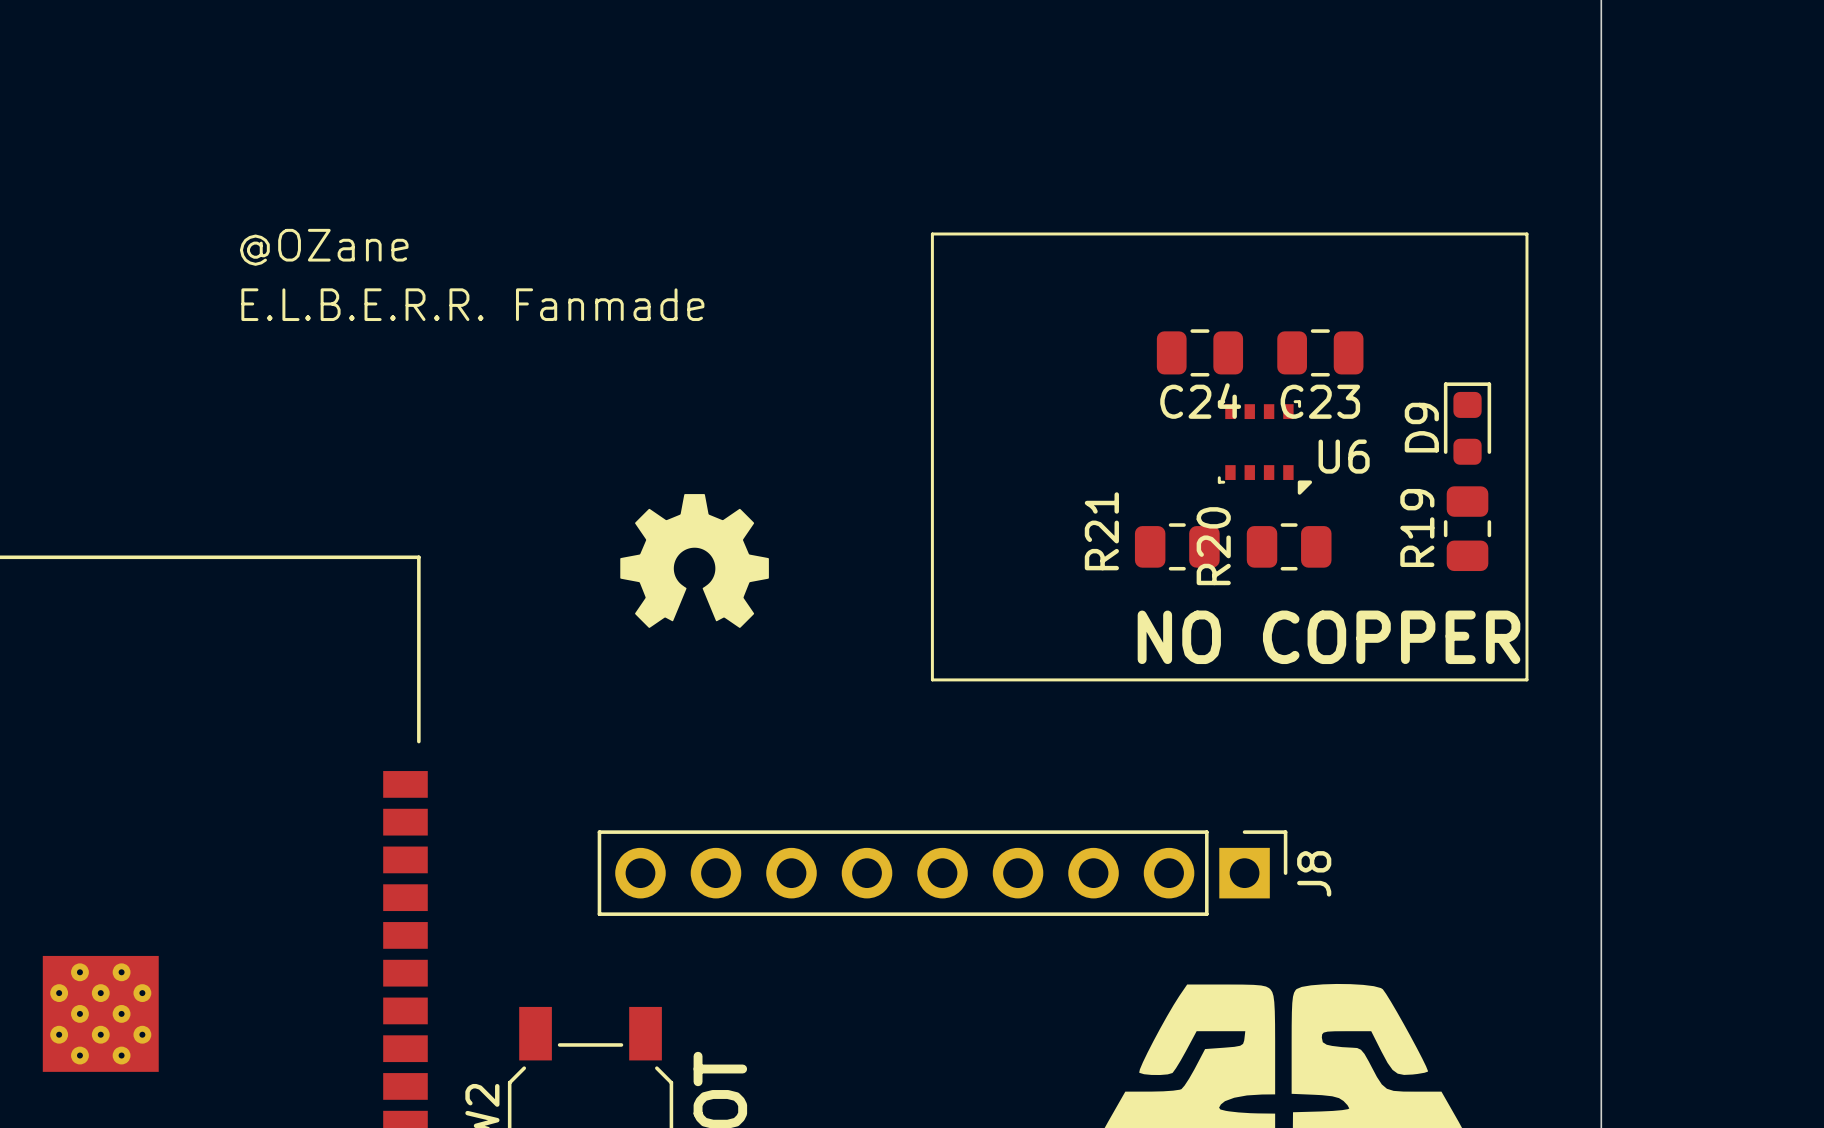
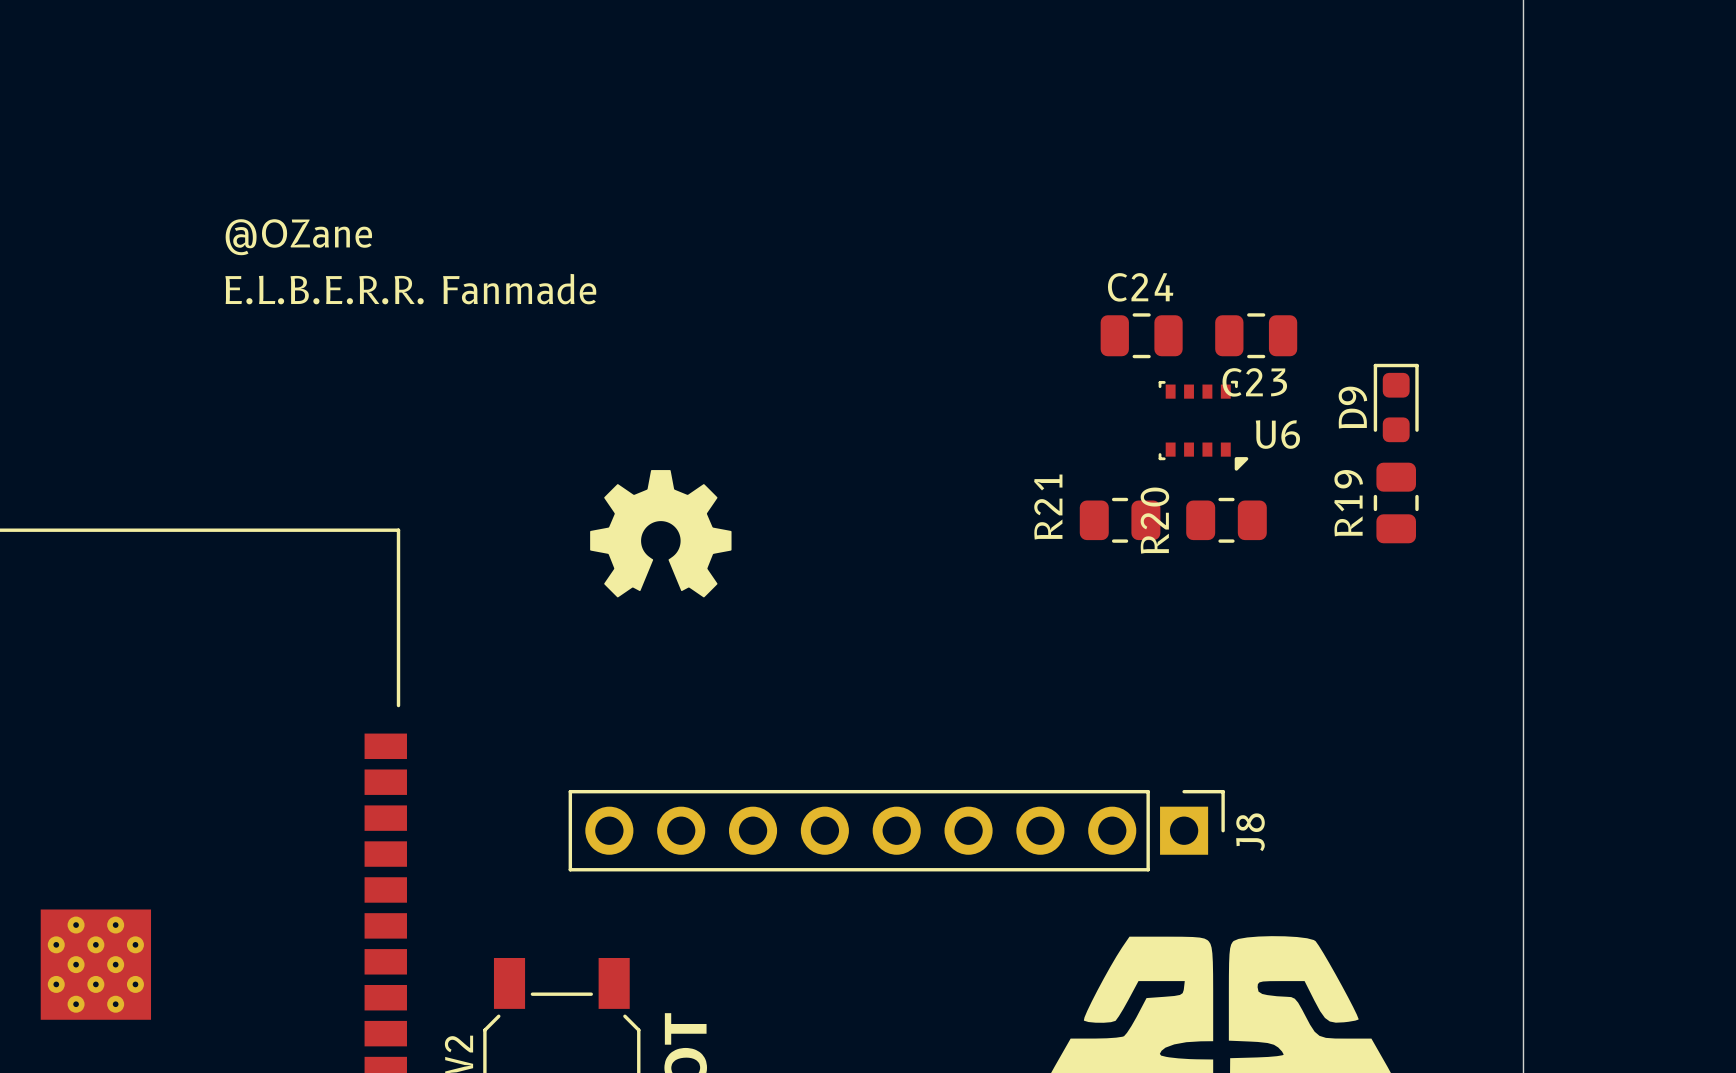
line: (932, 233) (1526, 233) (1526, 679) (932, 679) (932, 233) -> none
C24 name position: C24 (1200, 401) -> C24 (1140, 287)
text: NO COPPER (1328, 637) -> none

